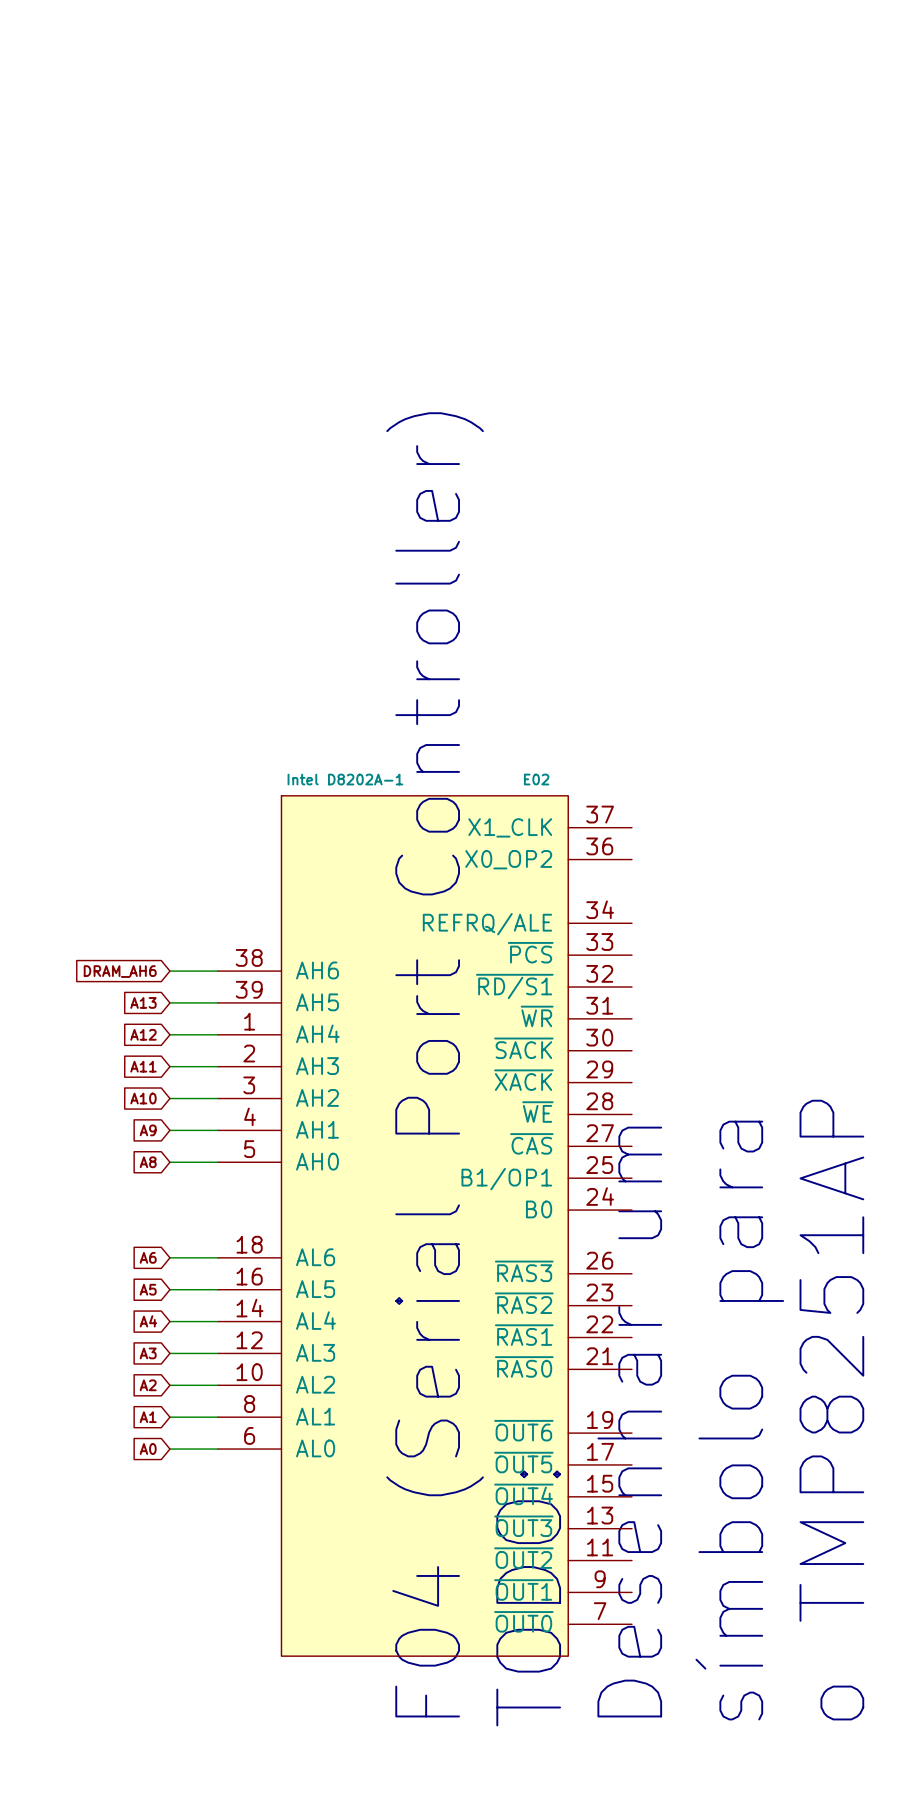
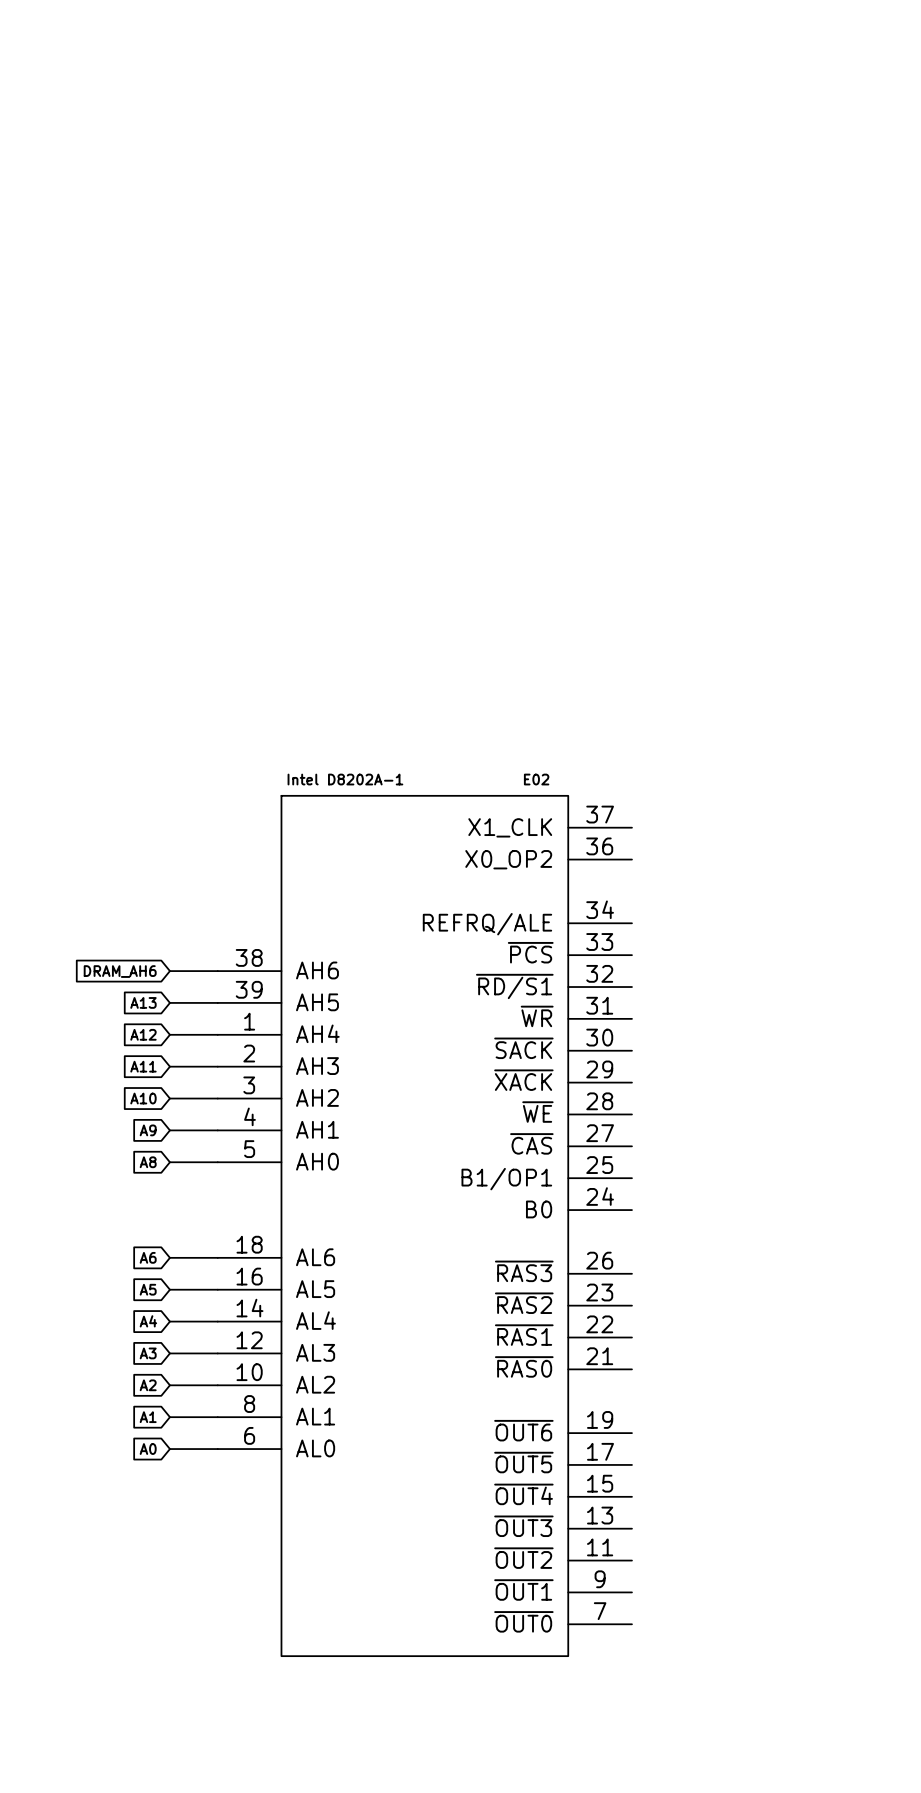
text: F04 (Serial Port Controller) (435, 1064) -> none
text: o TMP8251AP (831, 1410) -> none
text: símbolo para (739, 1420) -> none
text: Desenhar um (629, 1422) -> none
text: TODO: (528, 1598) -> none

